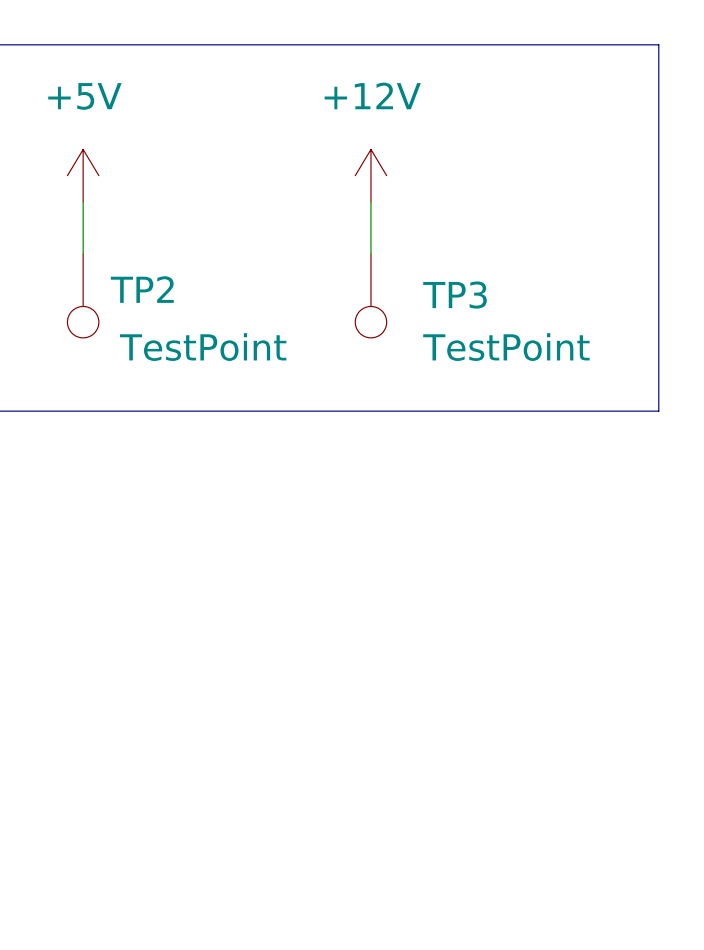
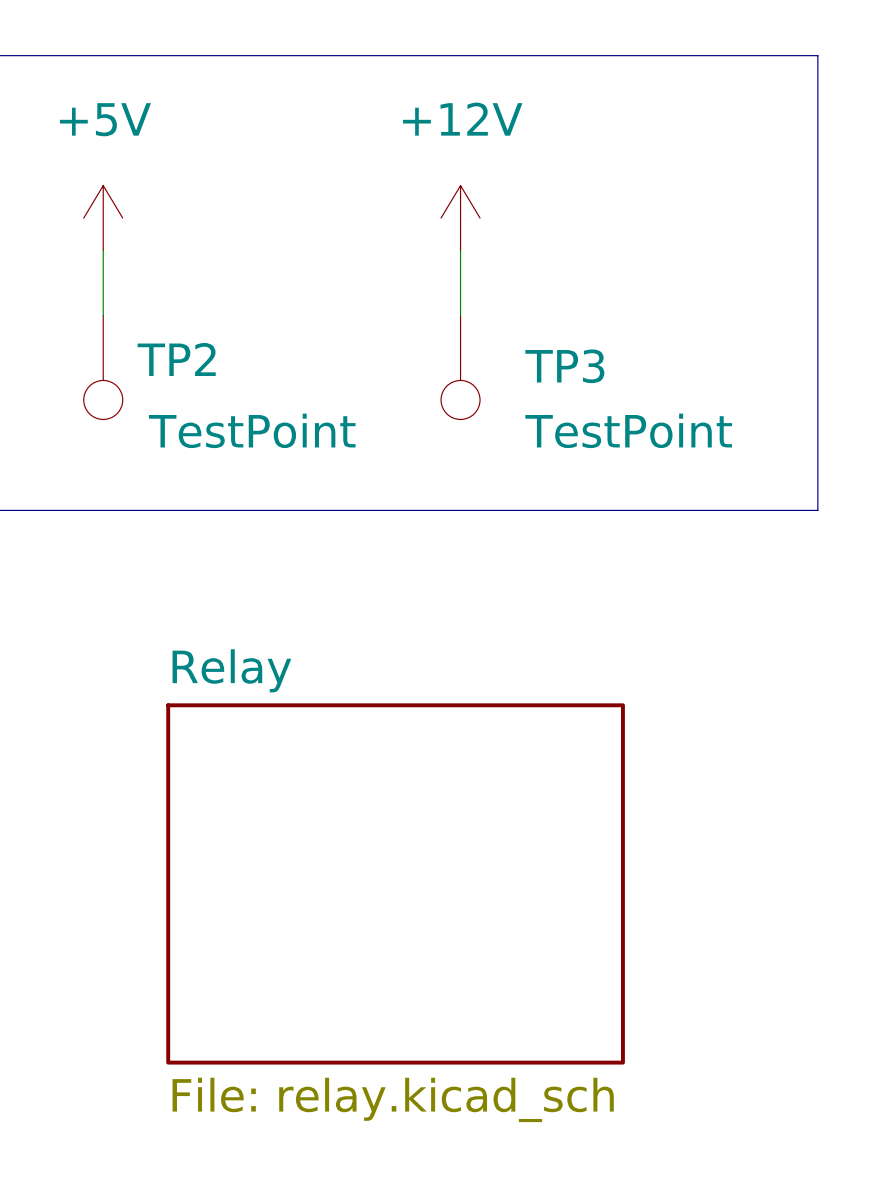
sheet Relay: none -> File: relay.kicad_sch (395, 883)

